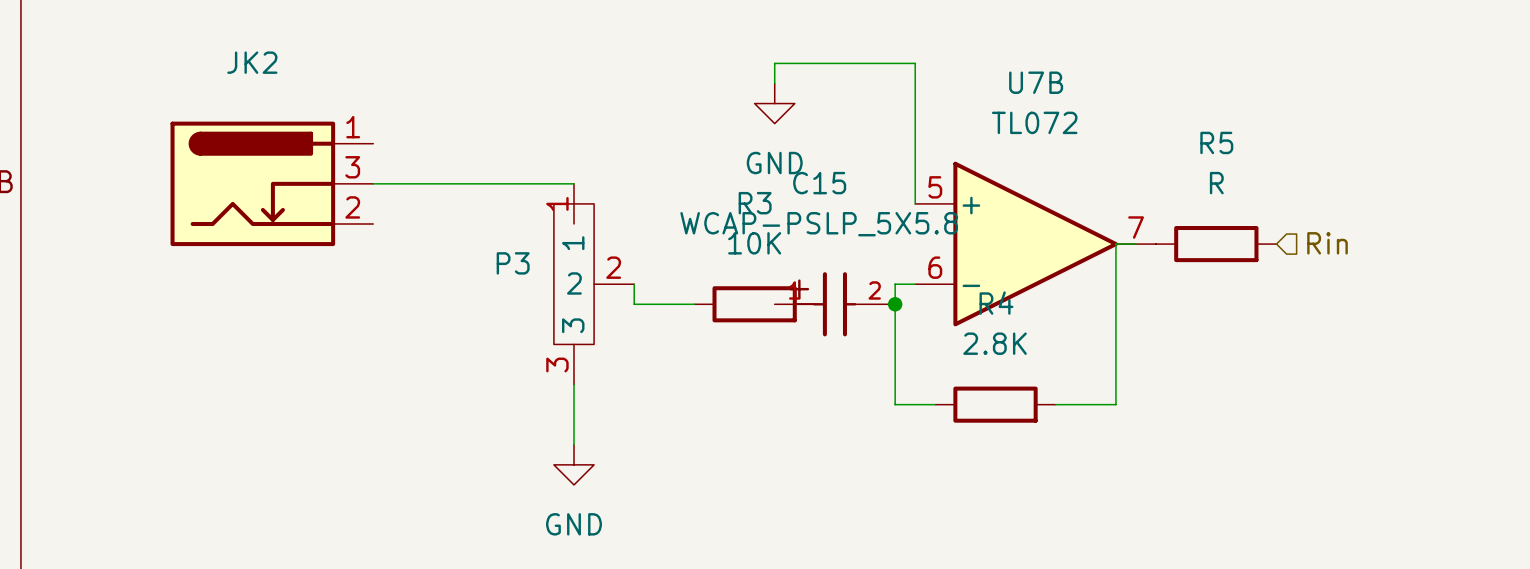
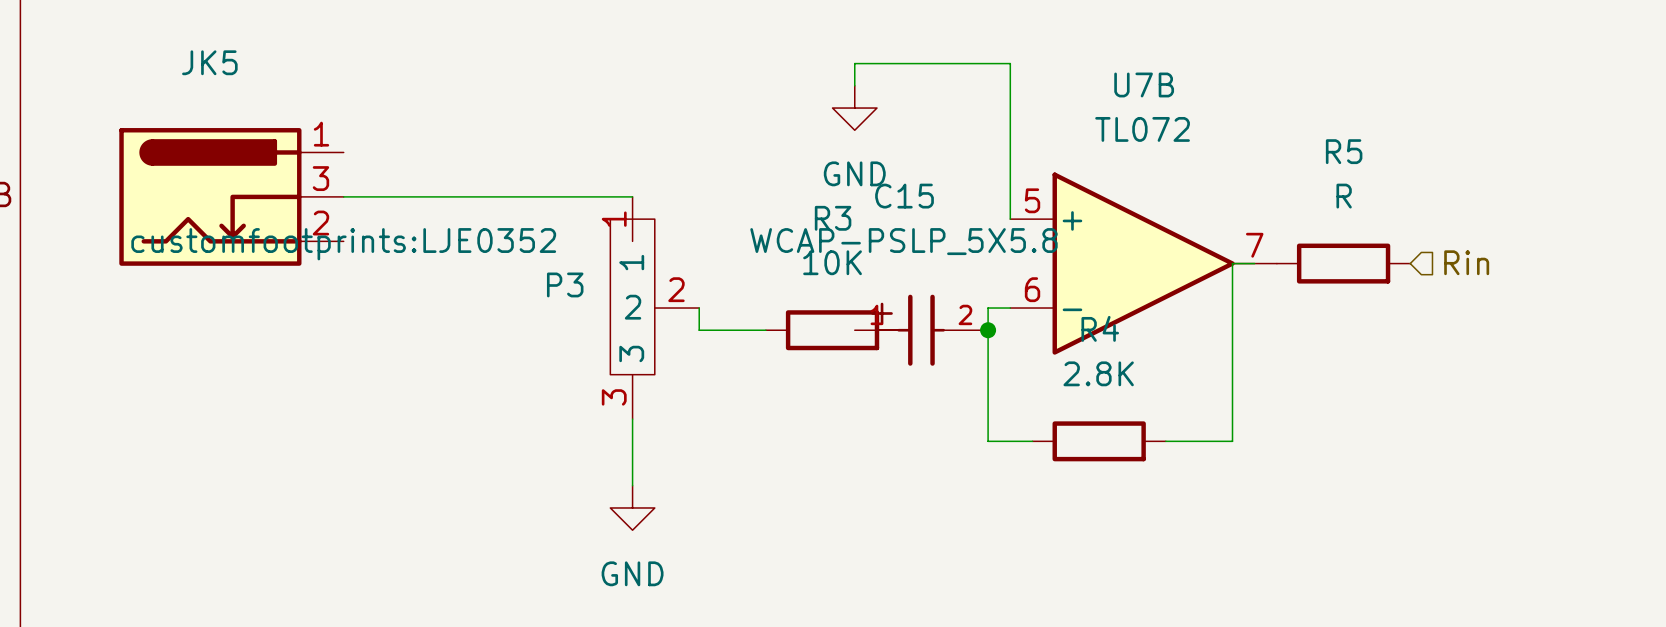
JK5: none -> (231, 196)
JK2: (271, 183) -> none

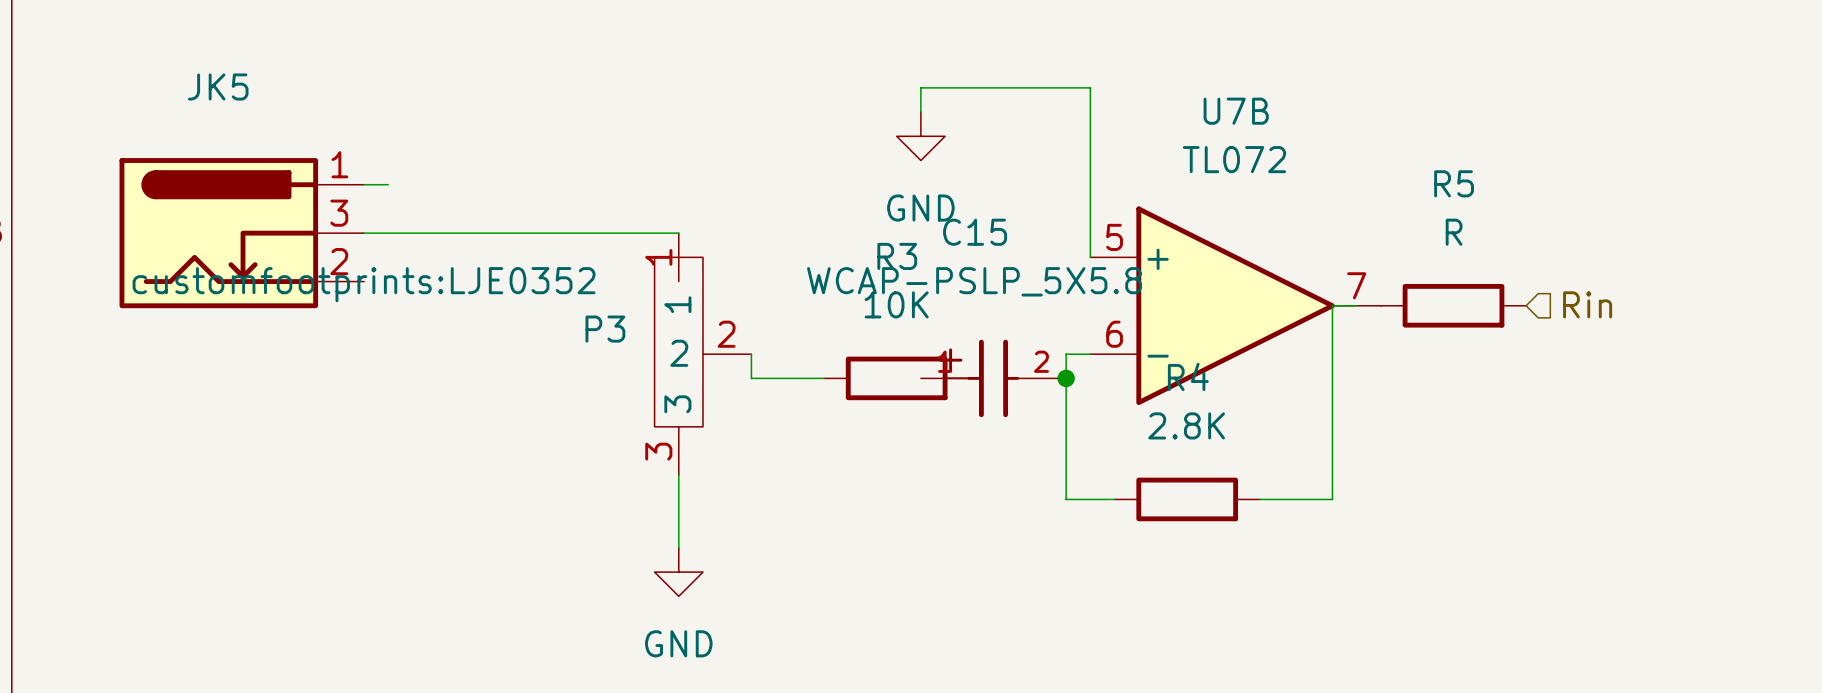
wire: none -> (364, 184) (388, 184)

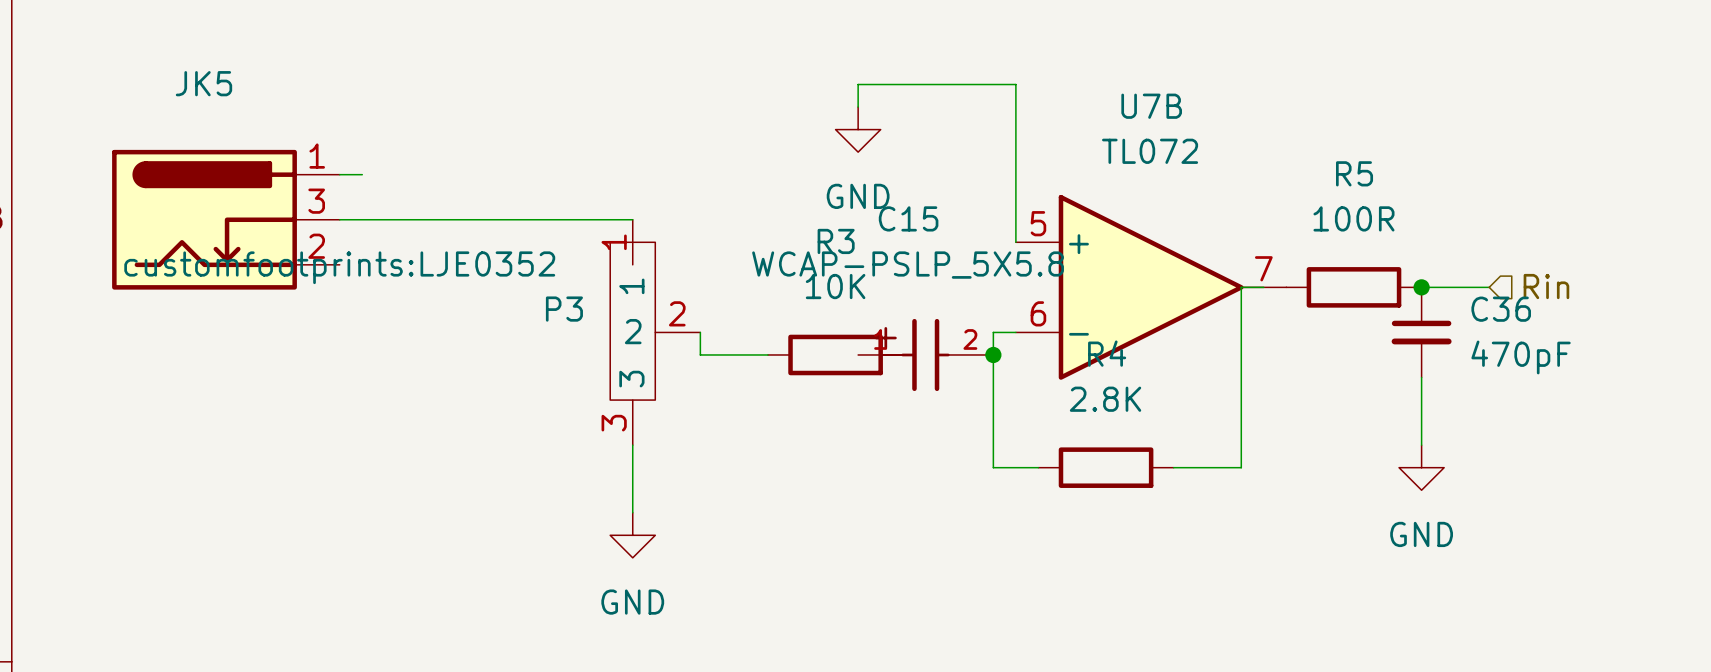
R5 value: R (1454, 232) -> 100R (1353, 218)
hierarchical label position: Rin (1587, 304) -> Rin (1546, 286)
wire: none -> (1421, 287) (1489, 287)
junction: none -> (1421, 287)
C36: none -> 470pF (1421, 332)
wire: none -> (1421, 377) (1421, 445)
power symbol: none -> GND (1421, 467)

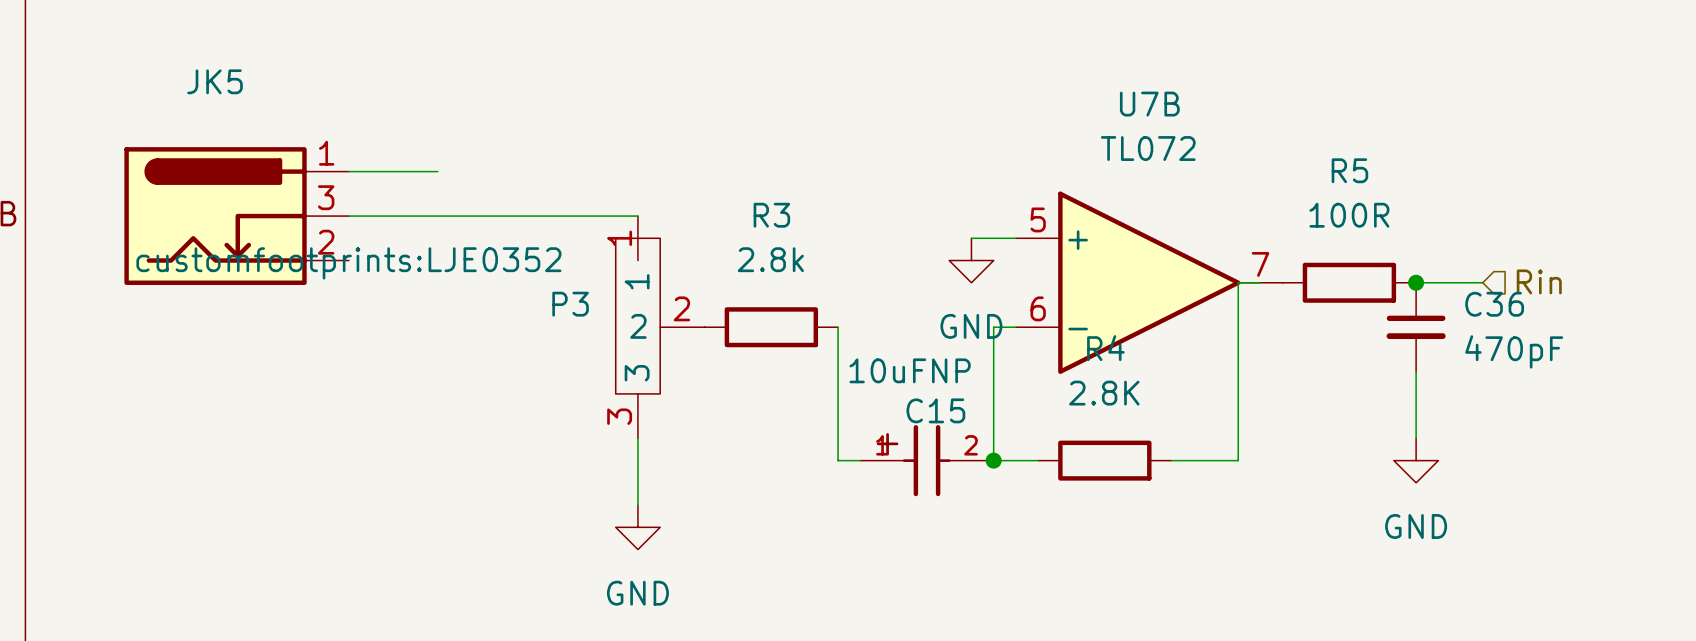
wire: (858, 107) (858, 84) (1015, 84) (1015, 242) -> (971, 238) (1015, 238)
power symbol position: GND (858, 129) -> GND (971, 260)
wire: none -> (371, 171) (437, 171)
C15 name position: C15 (908, 218) -> C15 (935, 410)
C15 value: WCAP-PSLP_5X5.8 (908, 265) -> 10uFNP (910, 370)
R3 value: 10K (835, 286) -> 2.8k (770, 259)
wire: (700, 332) (700, 354) (767, 354) -> none
wire: none -> (838, 327) (838, 460) (860, 460)
R3 position: (835, 354) -> (771, 327)
C15 position: (925, 354) -> (926, 460)
junction: (993, 354) -> none
junction: none -> (993, 460)

